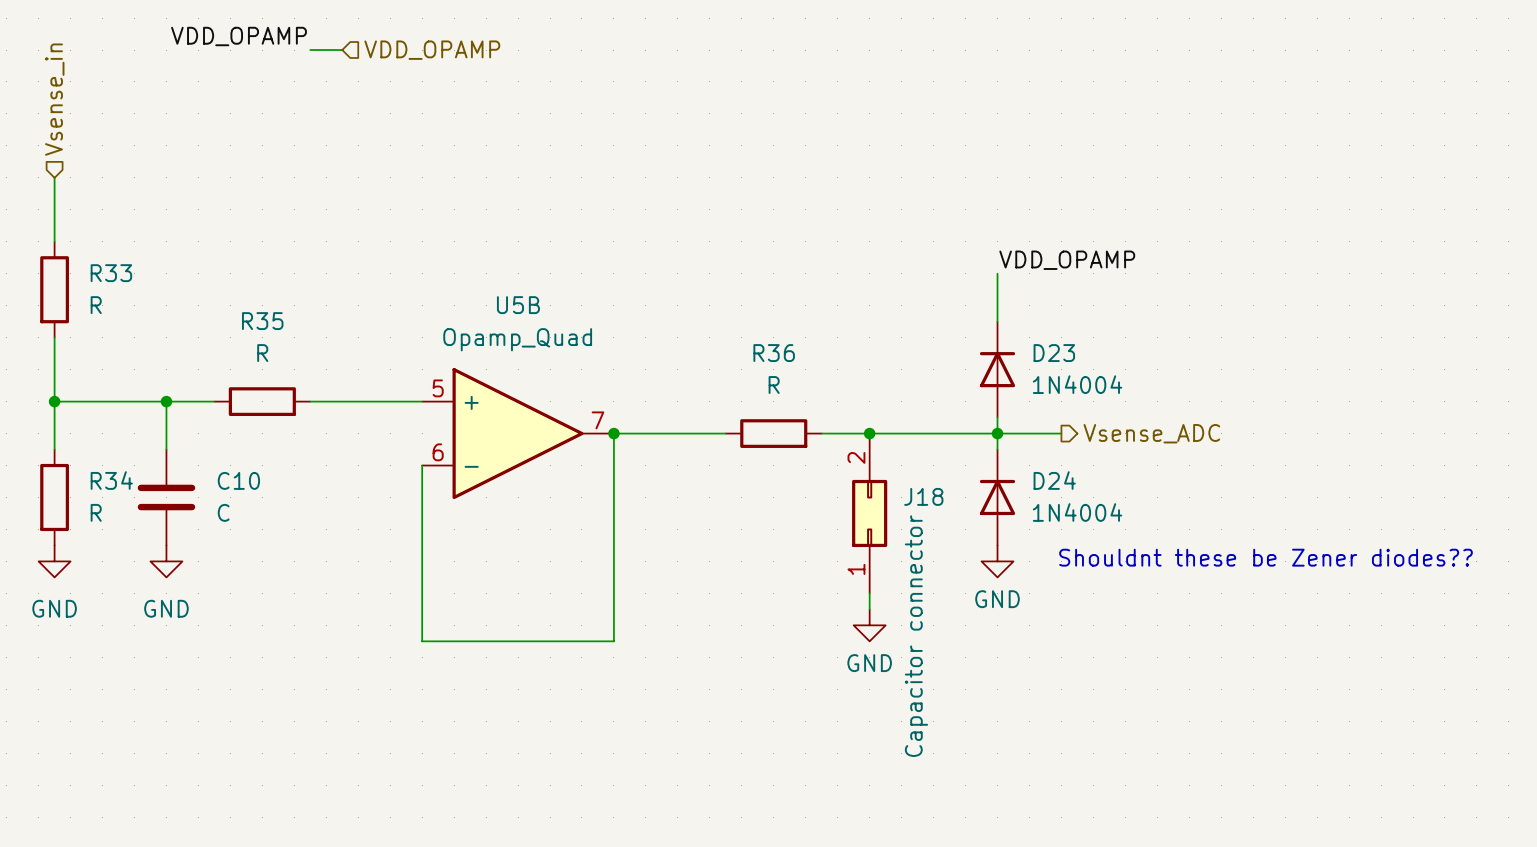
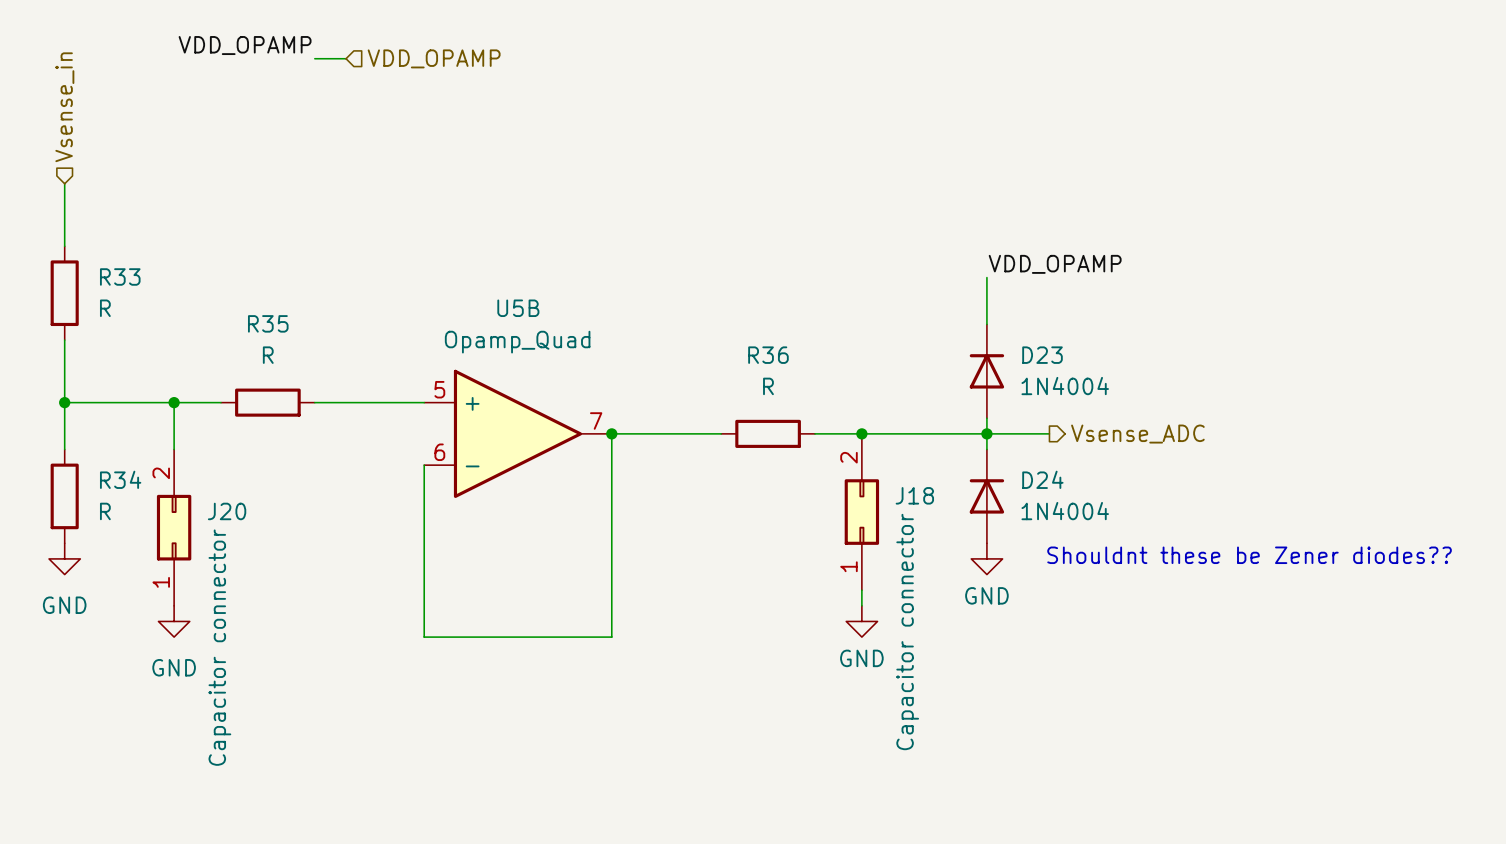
C10: C (166, 497) -> none
J20: none -> Capacitor connector (174, 527)
power symbol position: GND (166, 561) -> GND (174, 621)

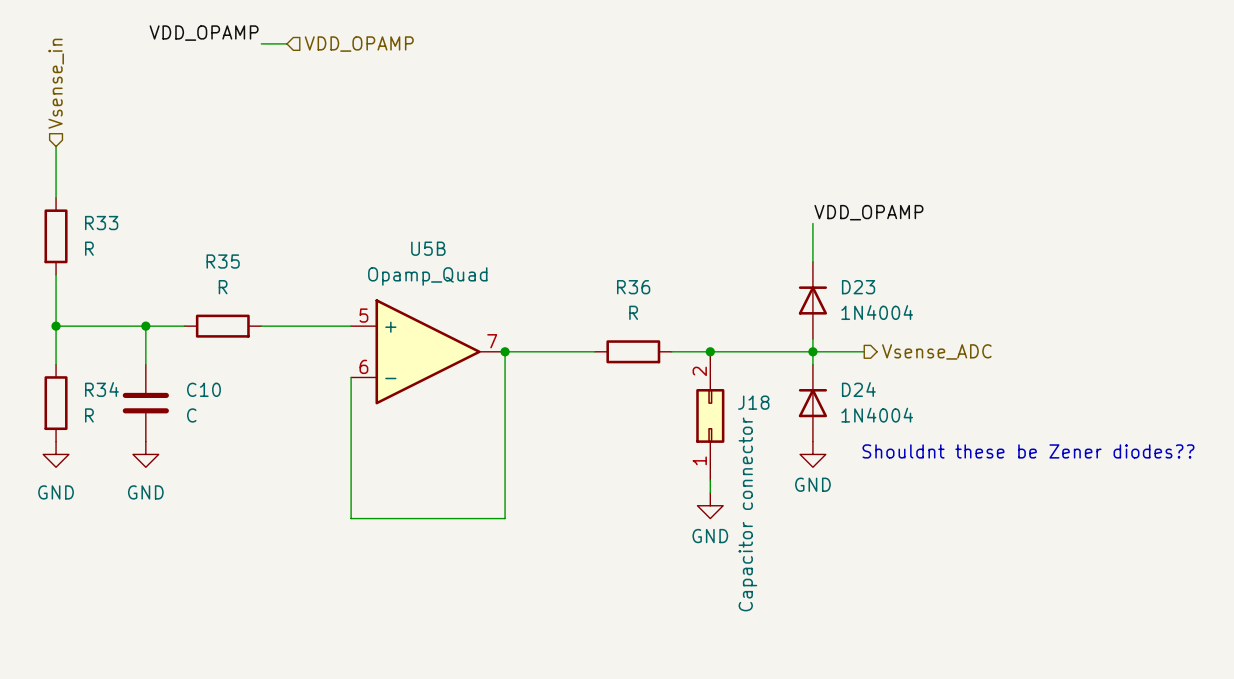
C10: none -> C (145, 403)
J20: Capacitor connector (174, 527) -> none
power symbol position: GND (174, 621) -> GND (145, 454)

